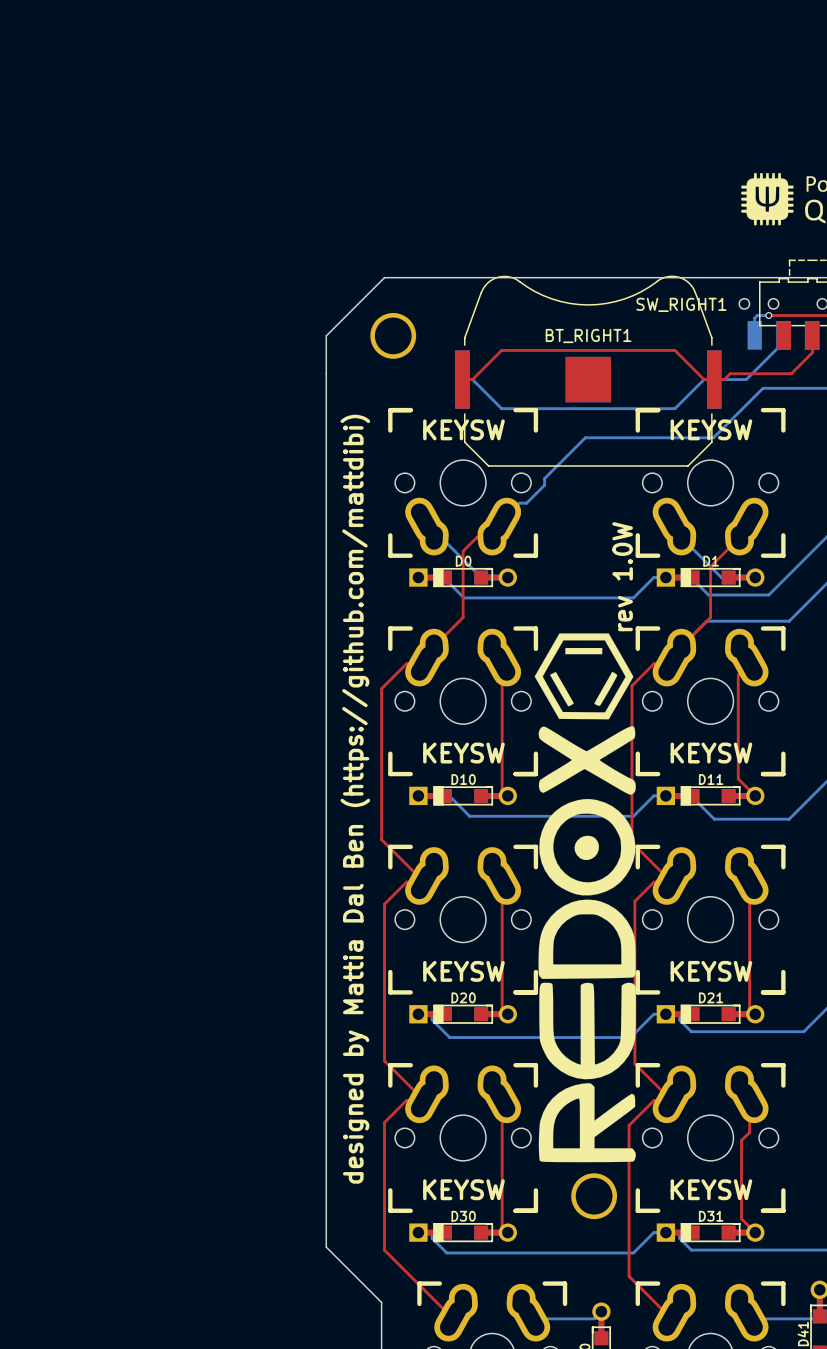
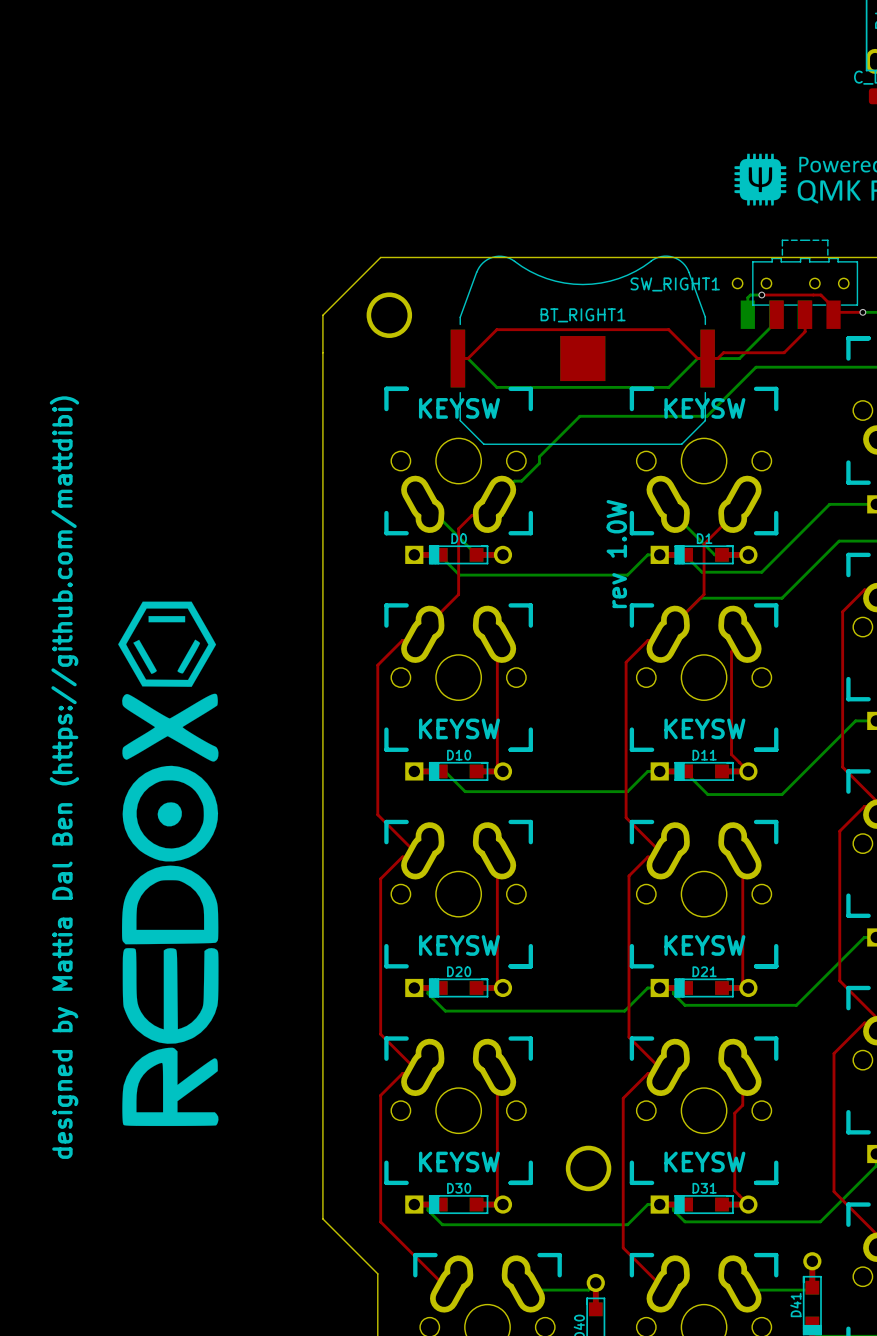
drawing: none -> [118, 601, 219, 1127]
drawing: [534, 633, 636, 1163] -> none
text: designed by Mattia Dal Ben (https://github.com/mattdibi) (355, 799) -> none
text: none -> designed by Mattia Dal Ben (https://github.com/mattdibi) (64, 777)

